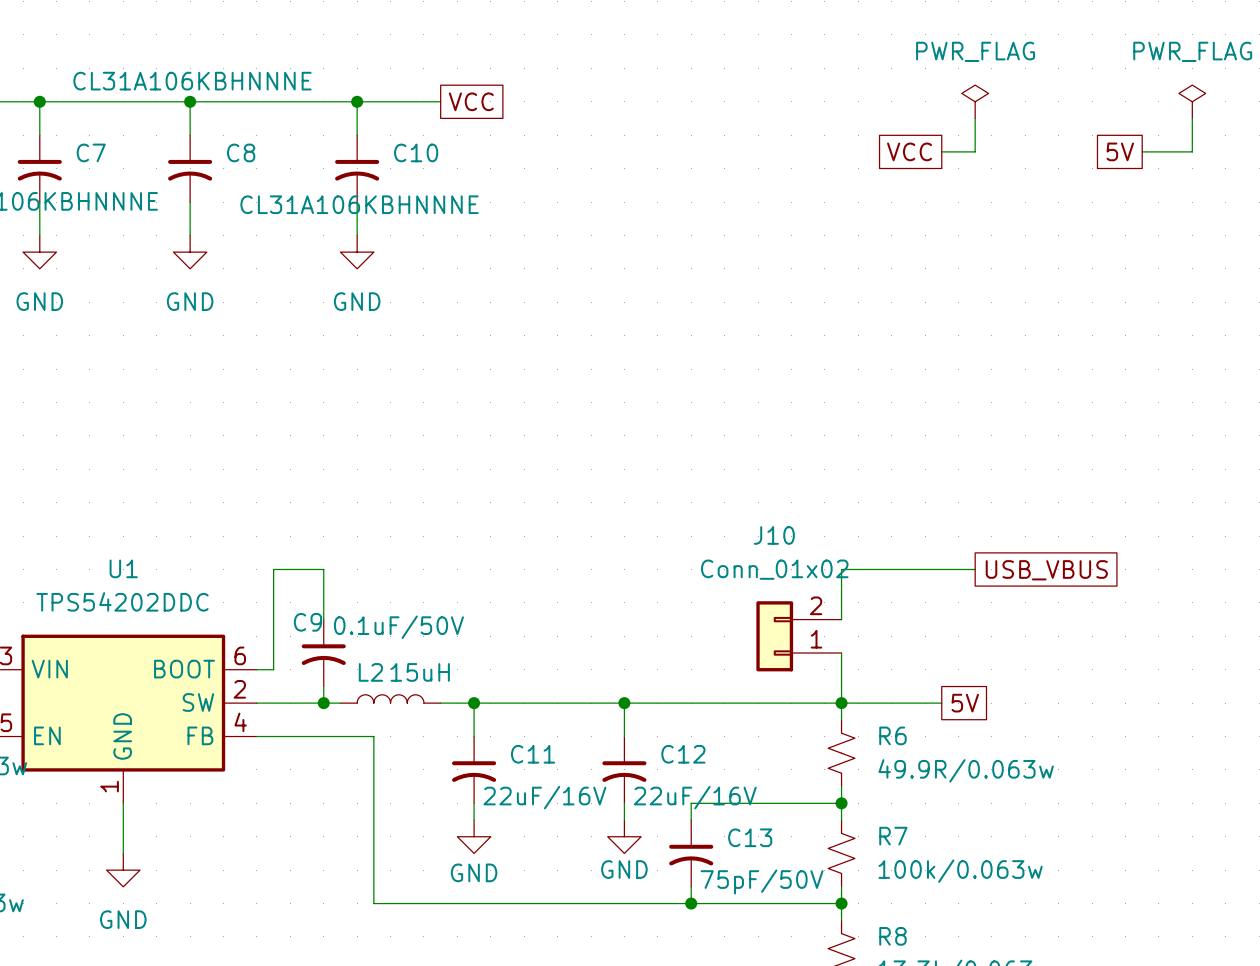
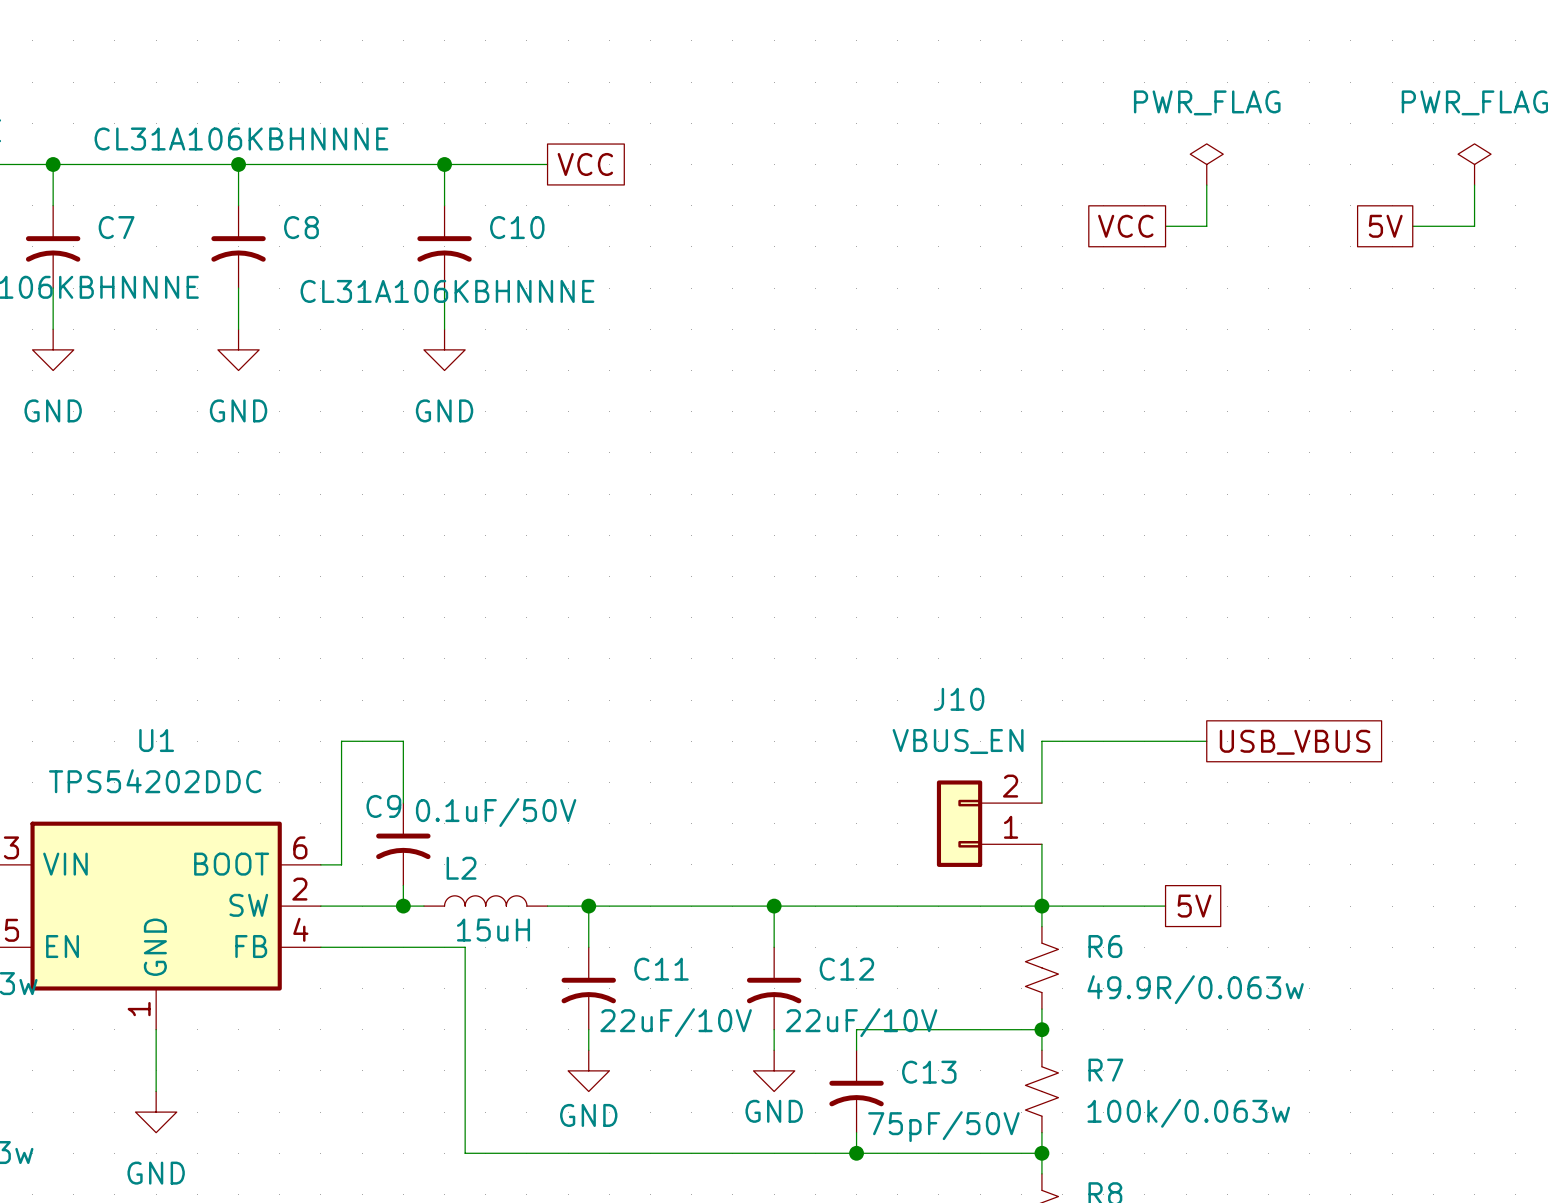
J10 value: Conn_01x02 (774, 569) -> VBUS_EN (958, 741)
L2 value position: 15uH (420, 672) -> 15uH (493, 930)
C11 value: 22uF/16V (544, 797) -> 22uF/10V (676, 1022)
C12 value: 22uF/16V (695, 797) -> 22uF/10V (861, 1022)

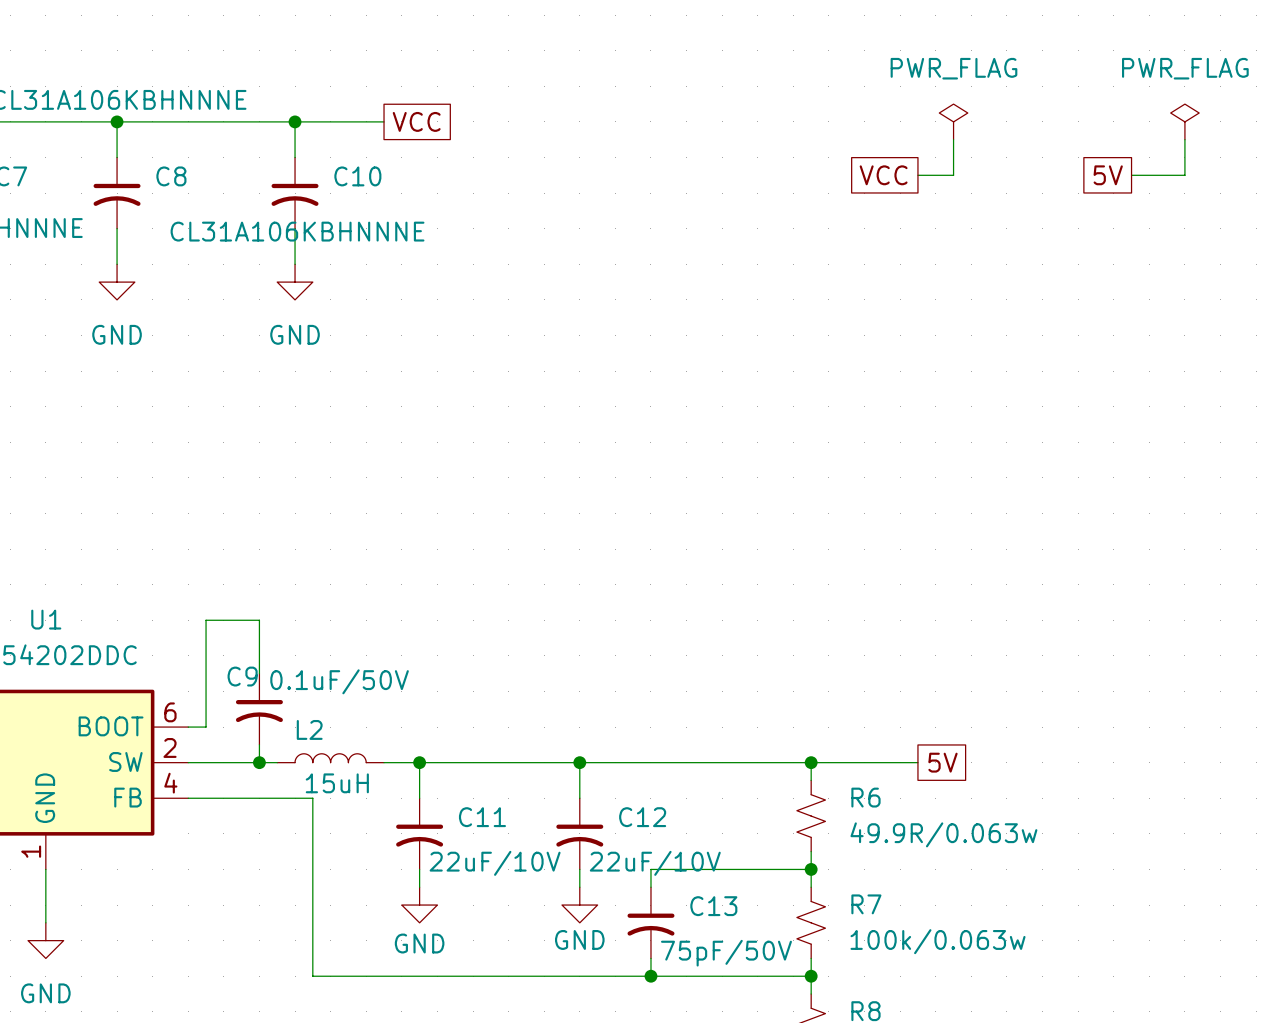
wire: (1206, 741) (1041, 741) (1041, 803) -> none
global label: USB_VBUS (1295, 742) -> none
J10: VBUS_EN (989, 823) -> none
wire: (1041, 844) (1041, 906) -> none

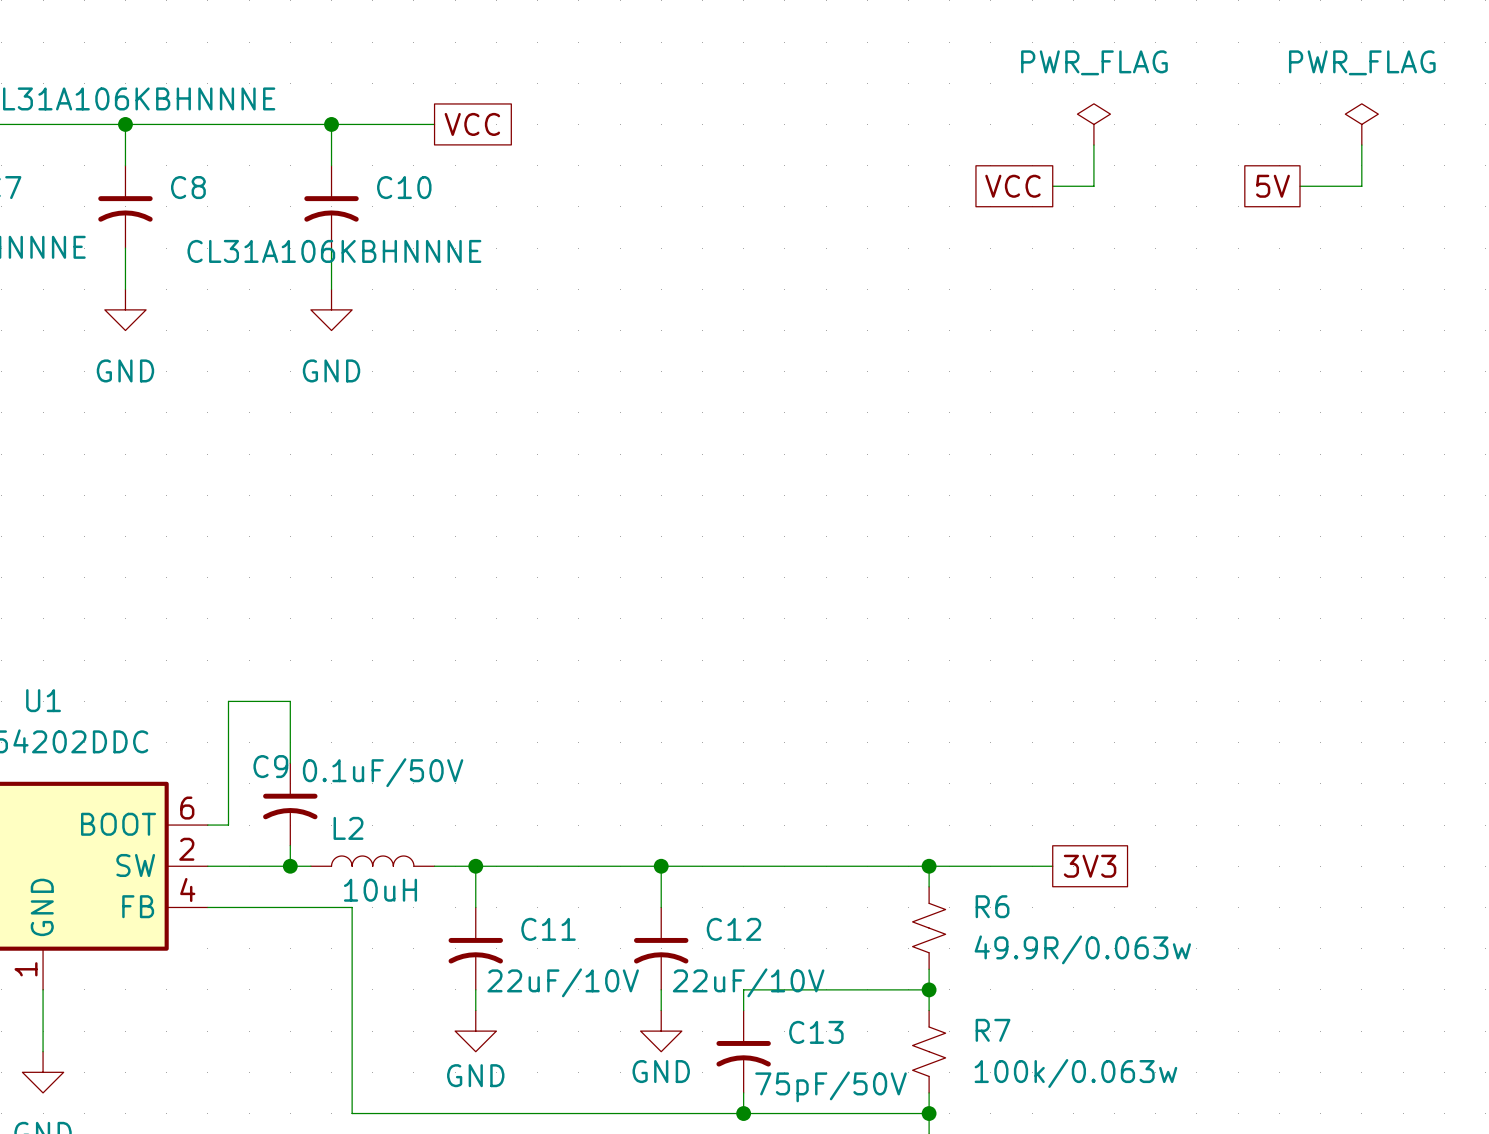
global label: 5V (942, 762) -> 3V3 (1090, 866)
L2 value: 15uH (337, 783) -> 10uH (380, 890)

